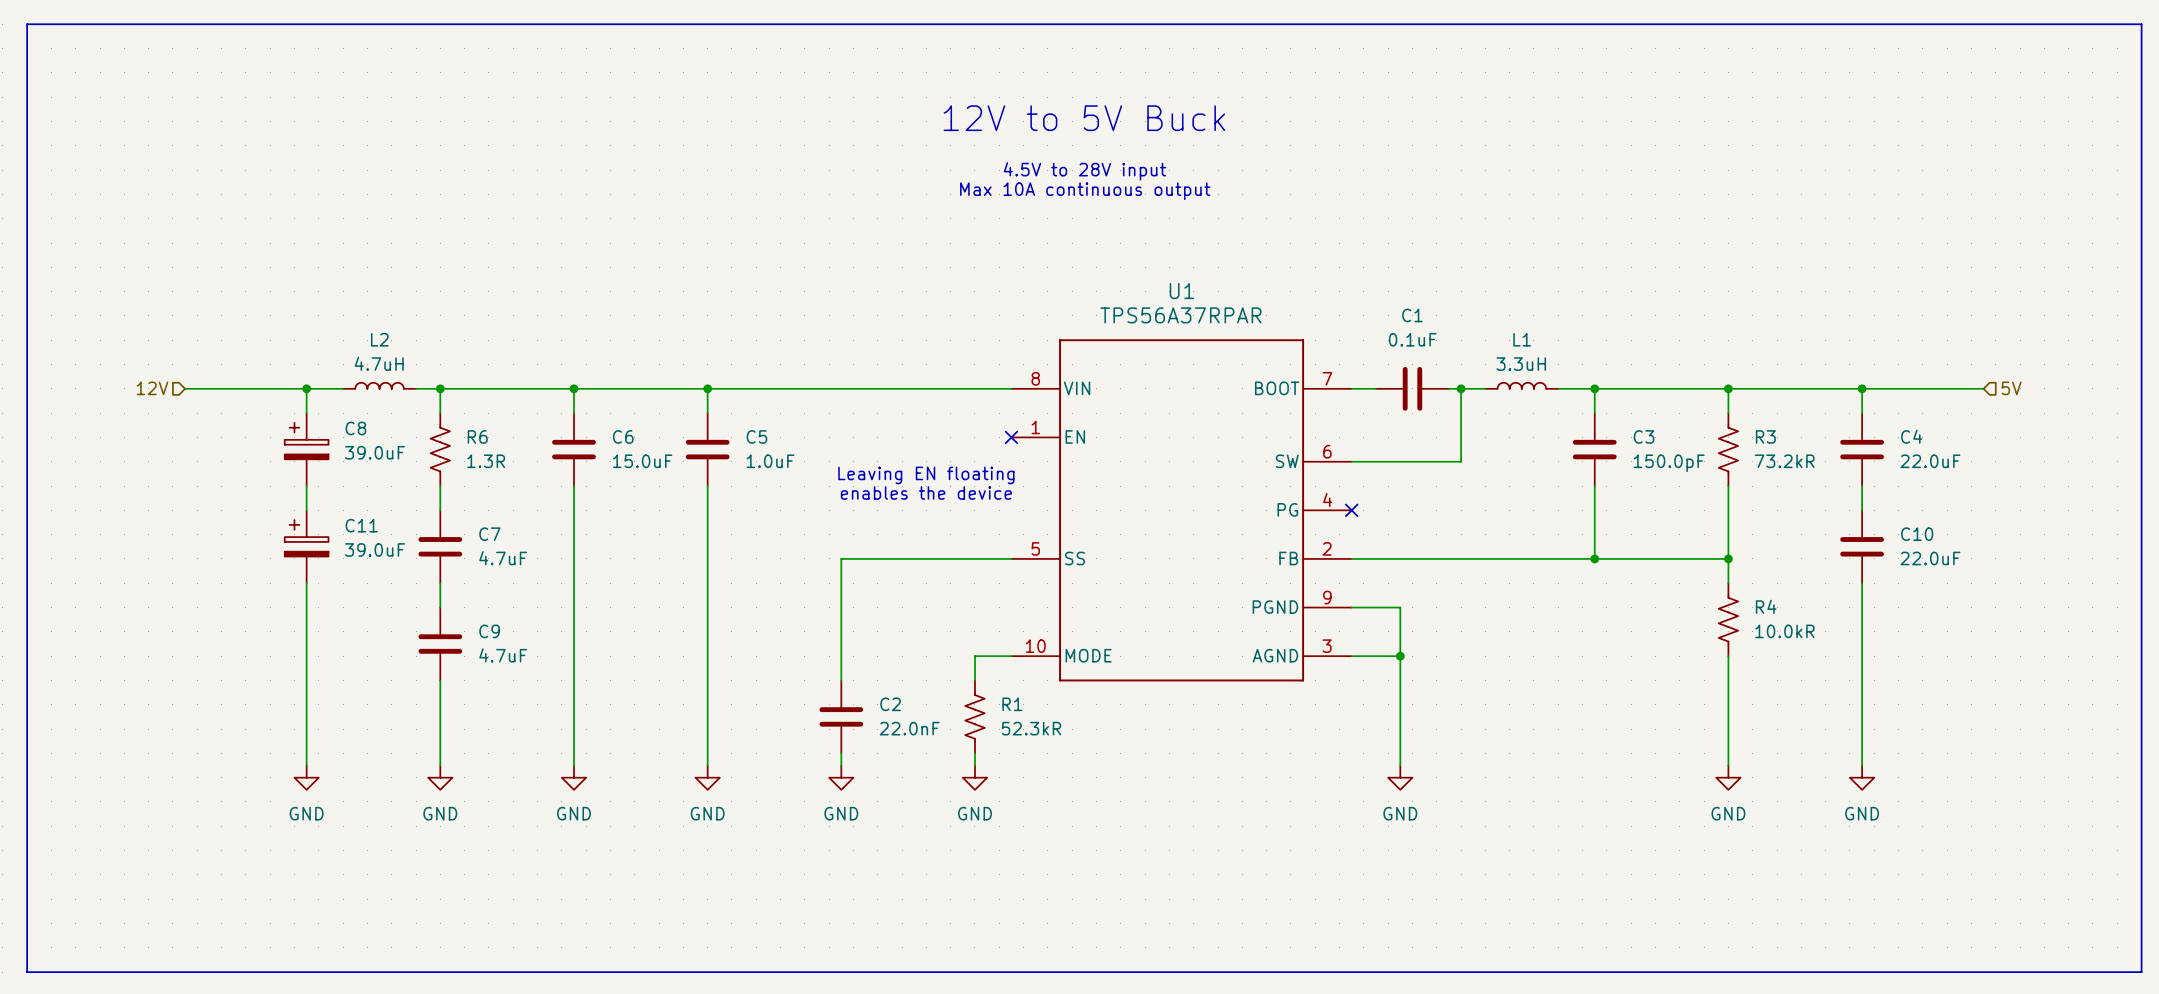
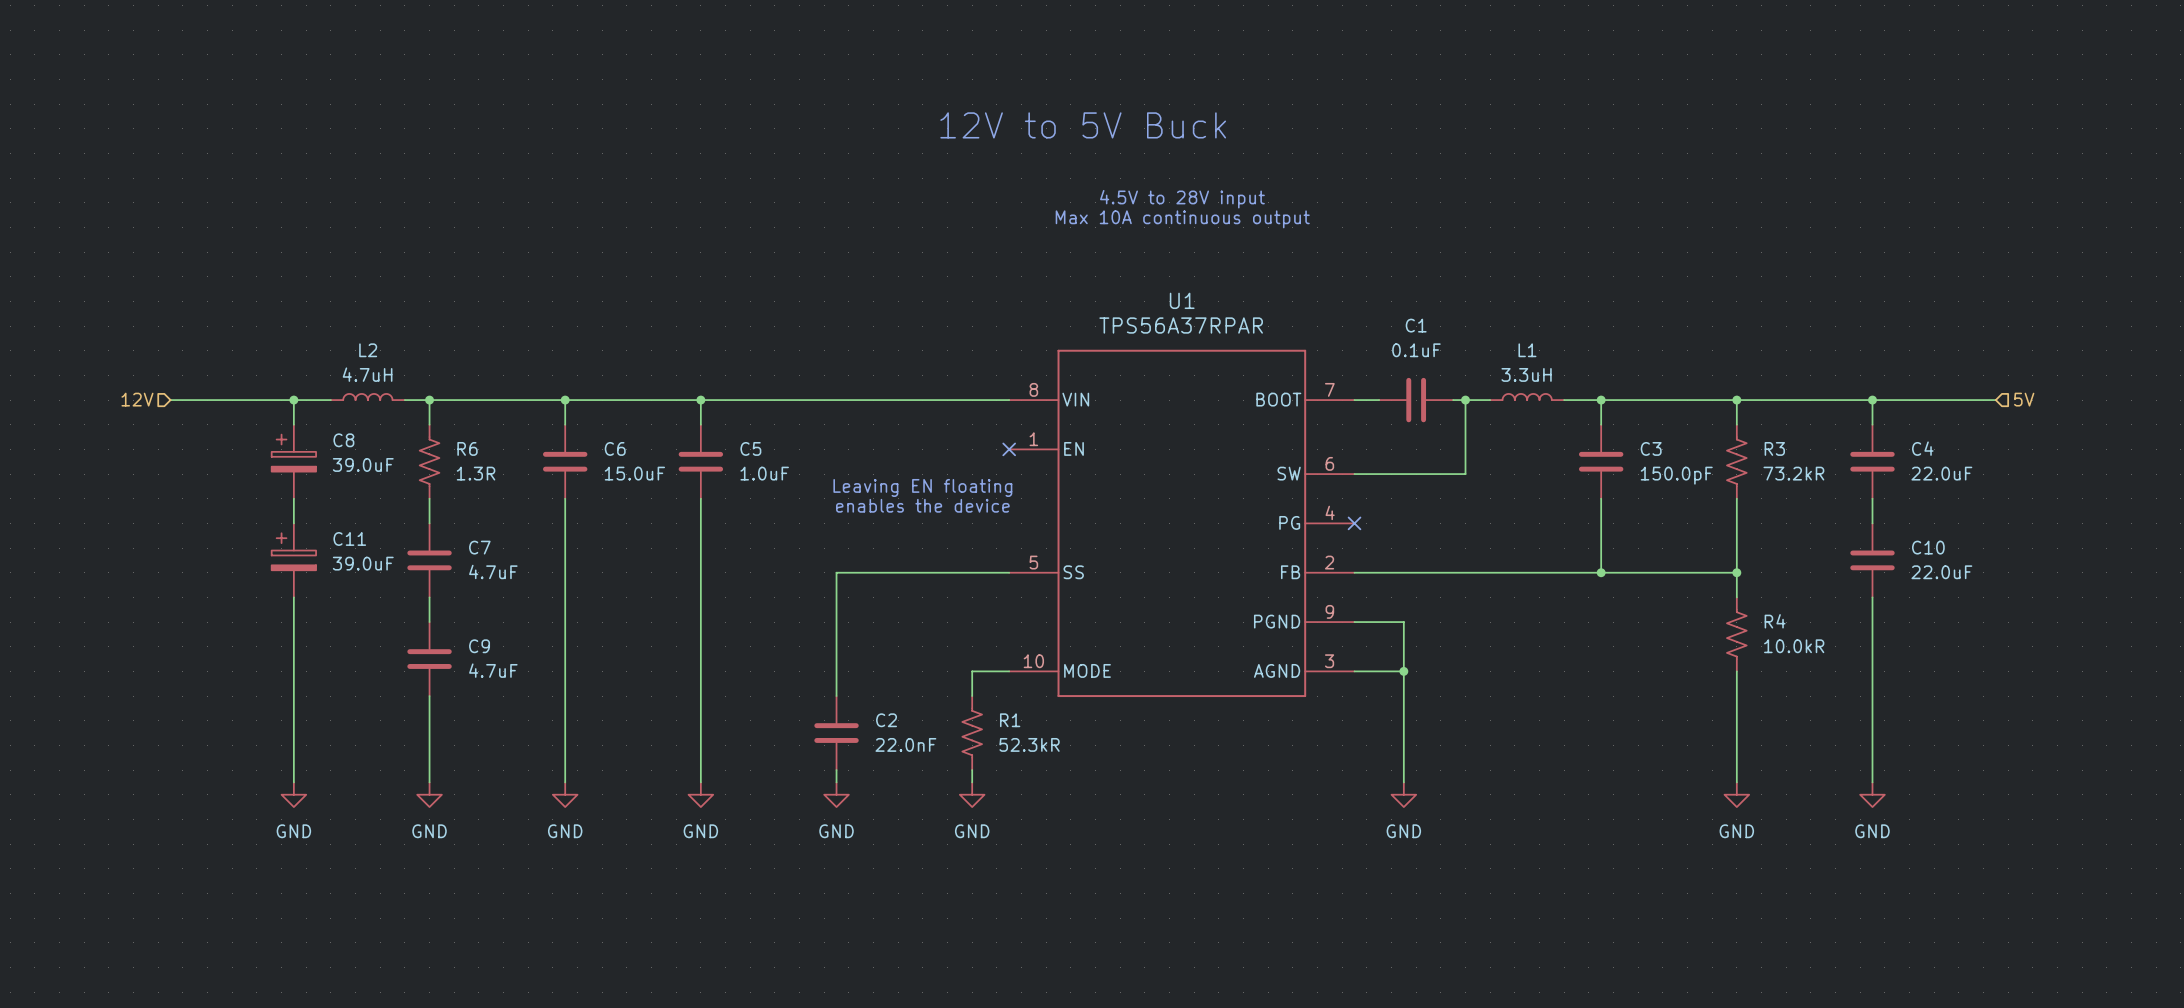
line: (27, 24) (2141, 24) (2141, 972) (27, 972) (27, 24) -> none
text position: 4.5V to 28V input (1084, 171) -> 4.5V to 28V input (1182, 199)
text position: Max 10A continuous output (1085, 191) -> Max 10A continuous output (1182, 219)

